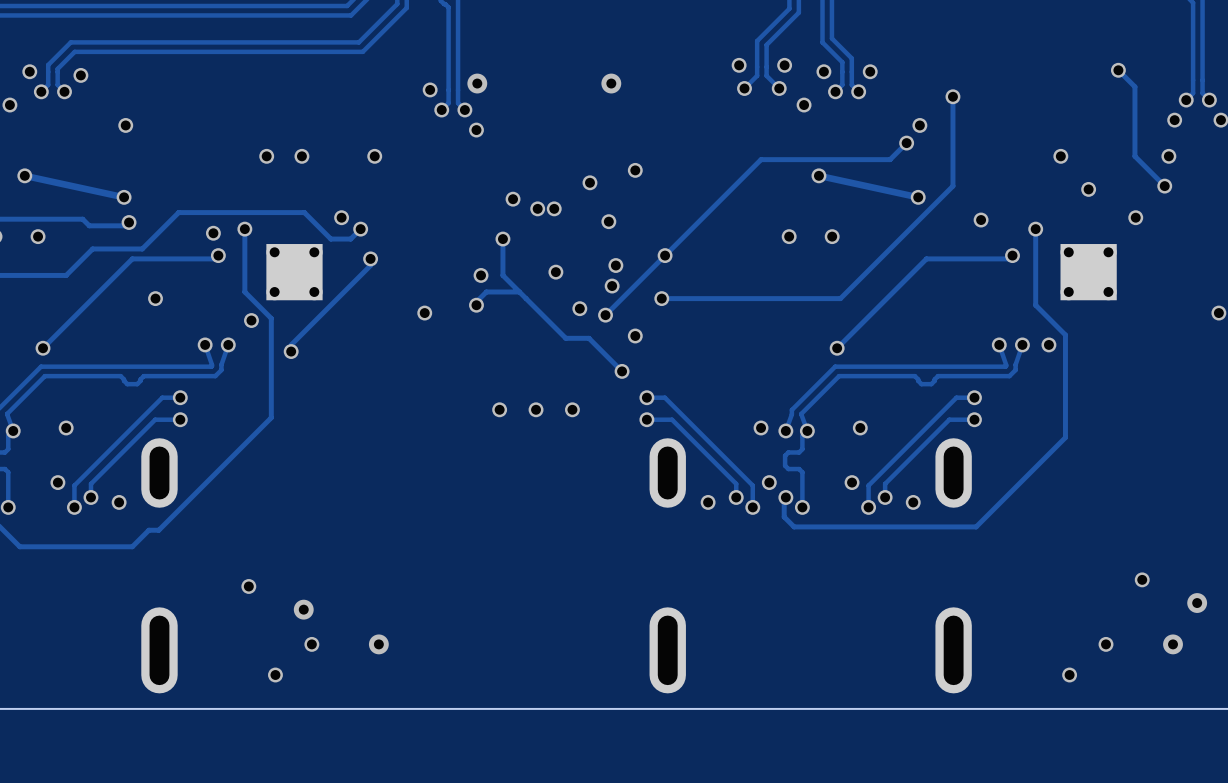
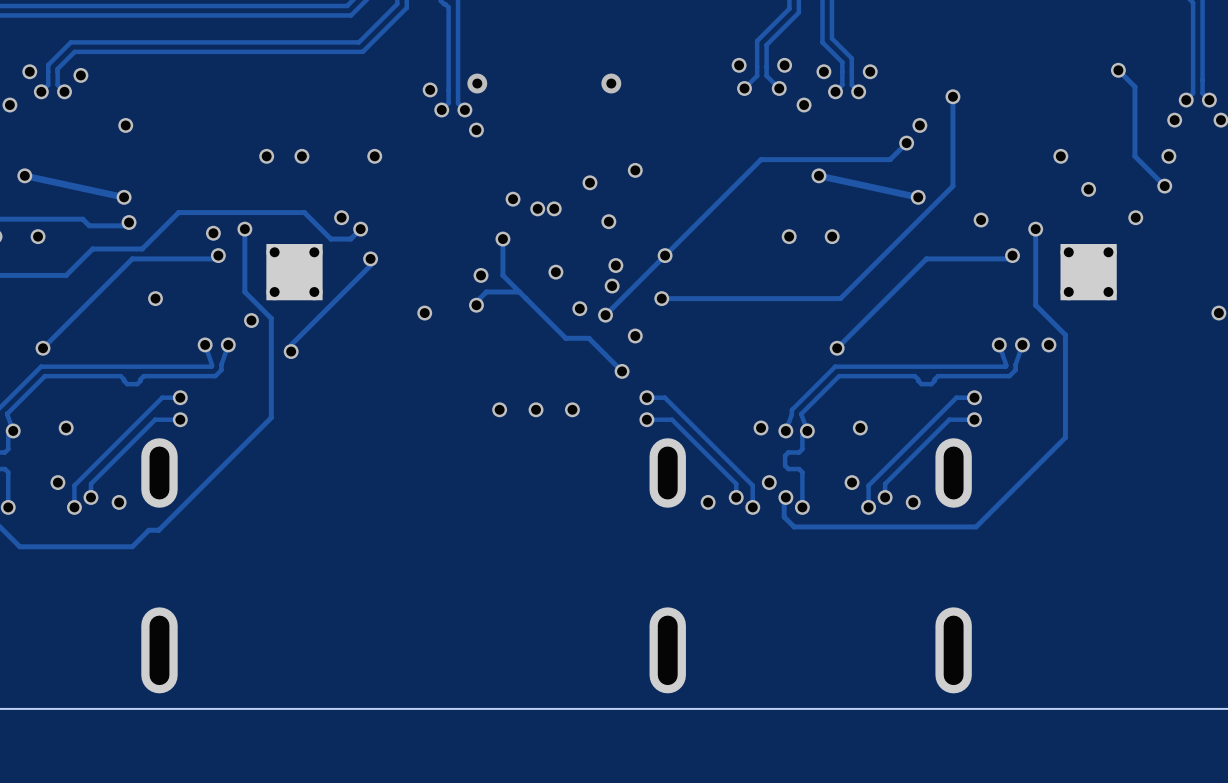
via: (1142, 579) -> none
via: (248, 586) -> none
via: (1197, 603) -> none
via: (303, 609) -> none
via: (311, 644) -> none
via: (378, 644) -> none
via: (1106, 644) -> none
via: (1173, 644) -> none
via: (275, 675) -> none
via: (1069, 675) -> none

